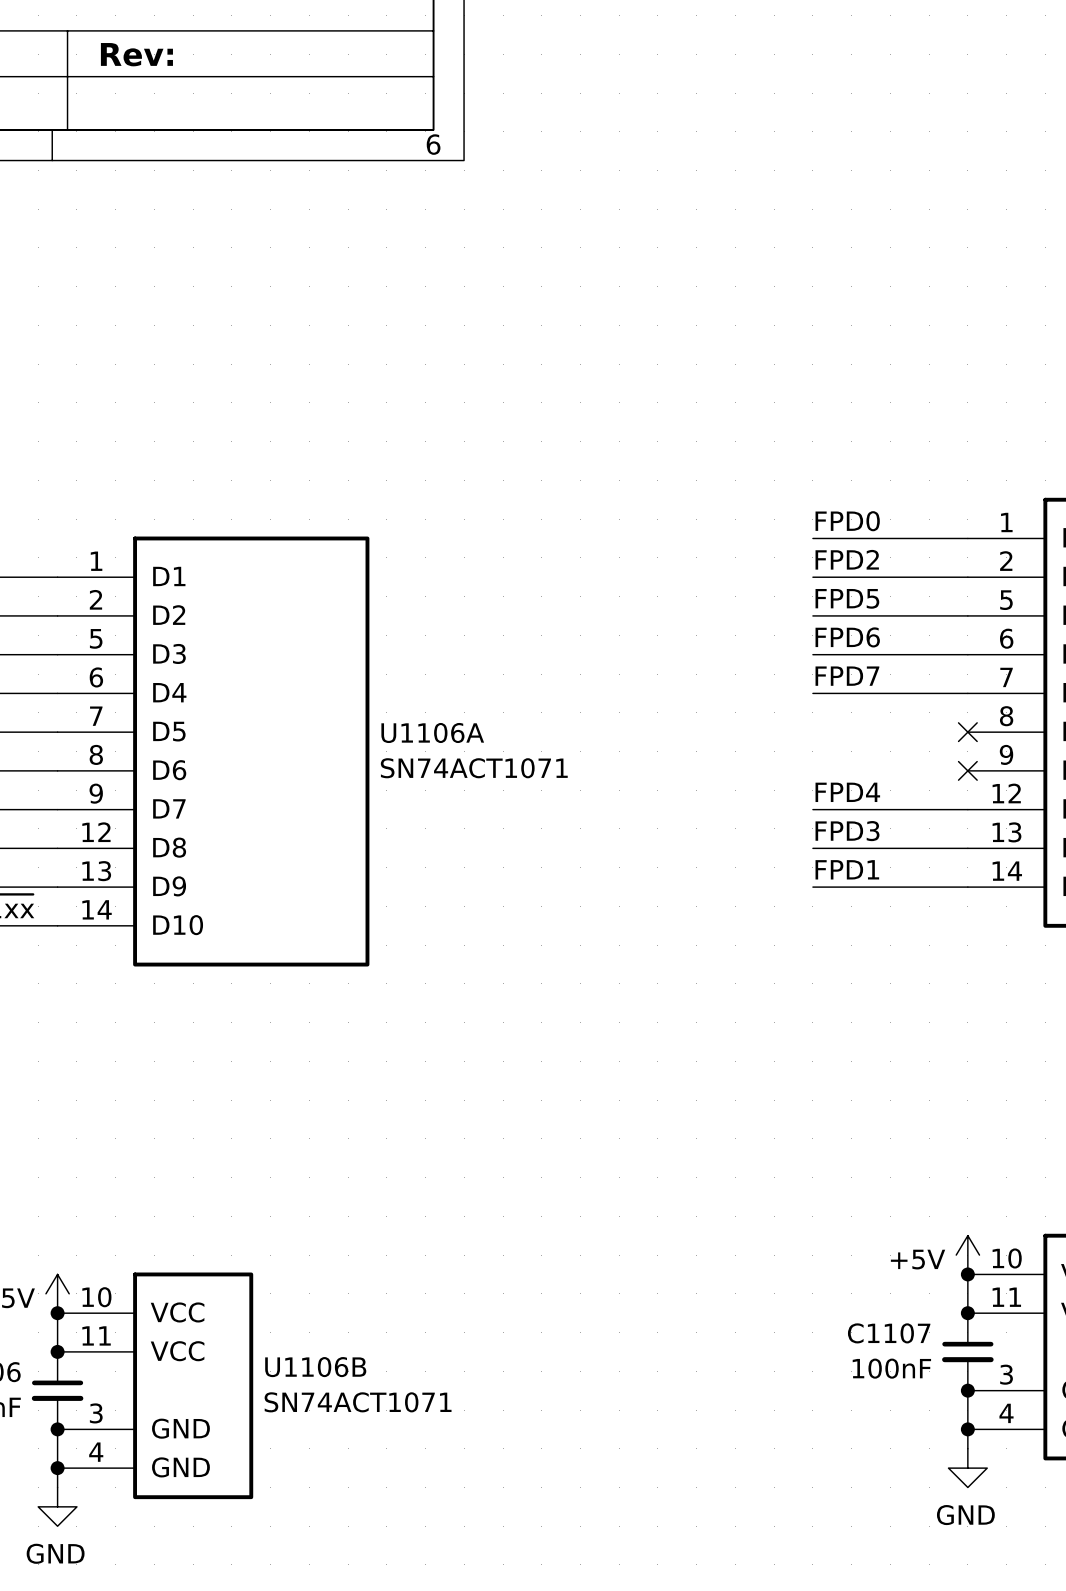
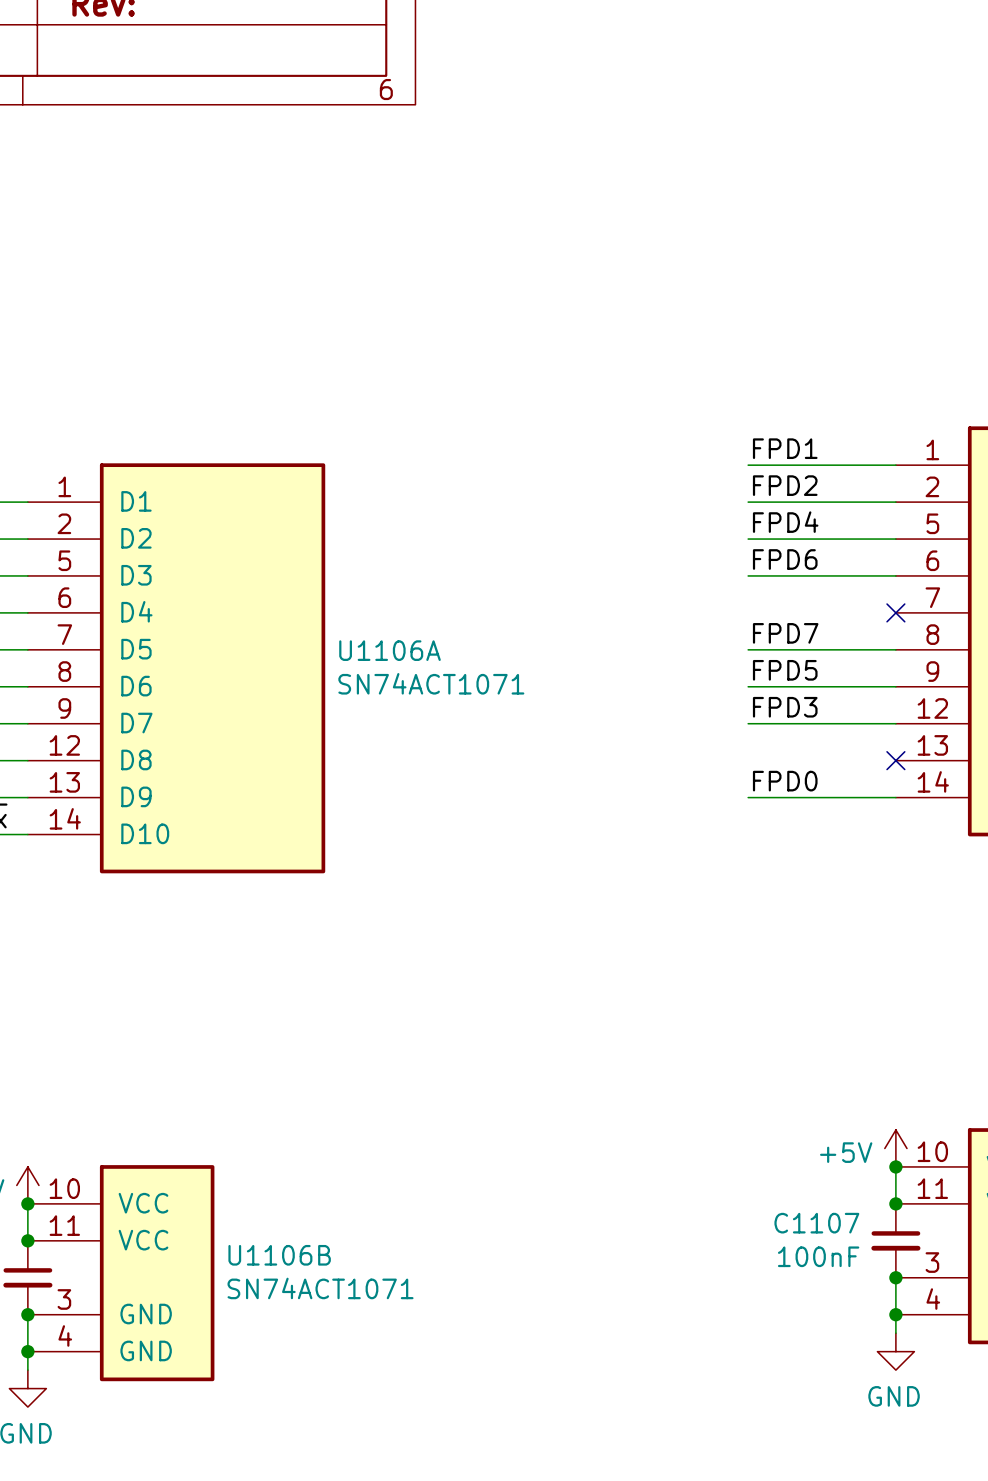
label: FPD0 (847, 521) -> FPD1 (785, 448)
label: FPD5 (847, 598) -> FPD4 (785, 522)
label position: FPD7 (847, 676) -> FPD7 (785, 633)
wire: (812, 693) (967, 693) -> (748, 649) (895, 649)
no-connect mark: none -> (895, 612)
no-connect mark: (967, 732) -> none
label: none -> FPD5 (785, 670)
no-connect mark: (967, 770) -> none
label: FPD4 (847, 792) -> FPD3 (785, 707)
label: FPD3 (847, 831) -> none
wire: (812, 848) (967, 848) -> (748, 686) (895, 686)
no-connect mark: none -> (895, 760)
label: FPD1 (847, 869) -> FPD0 (785, 781)

